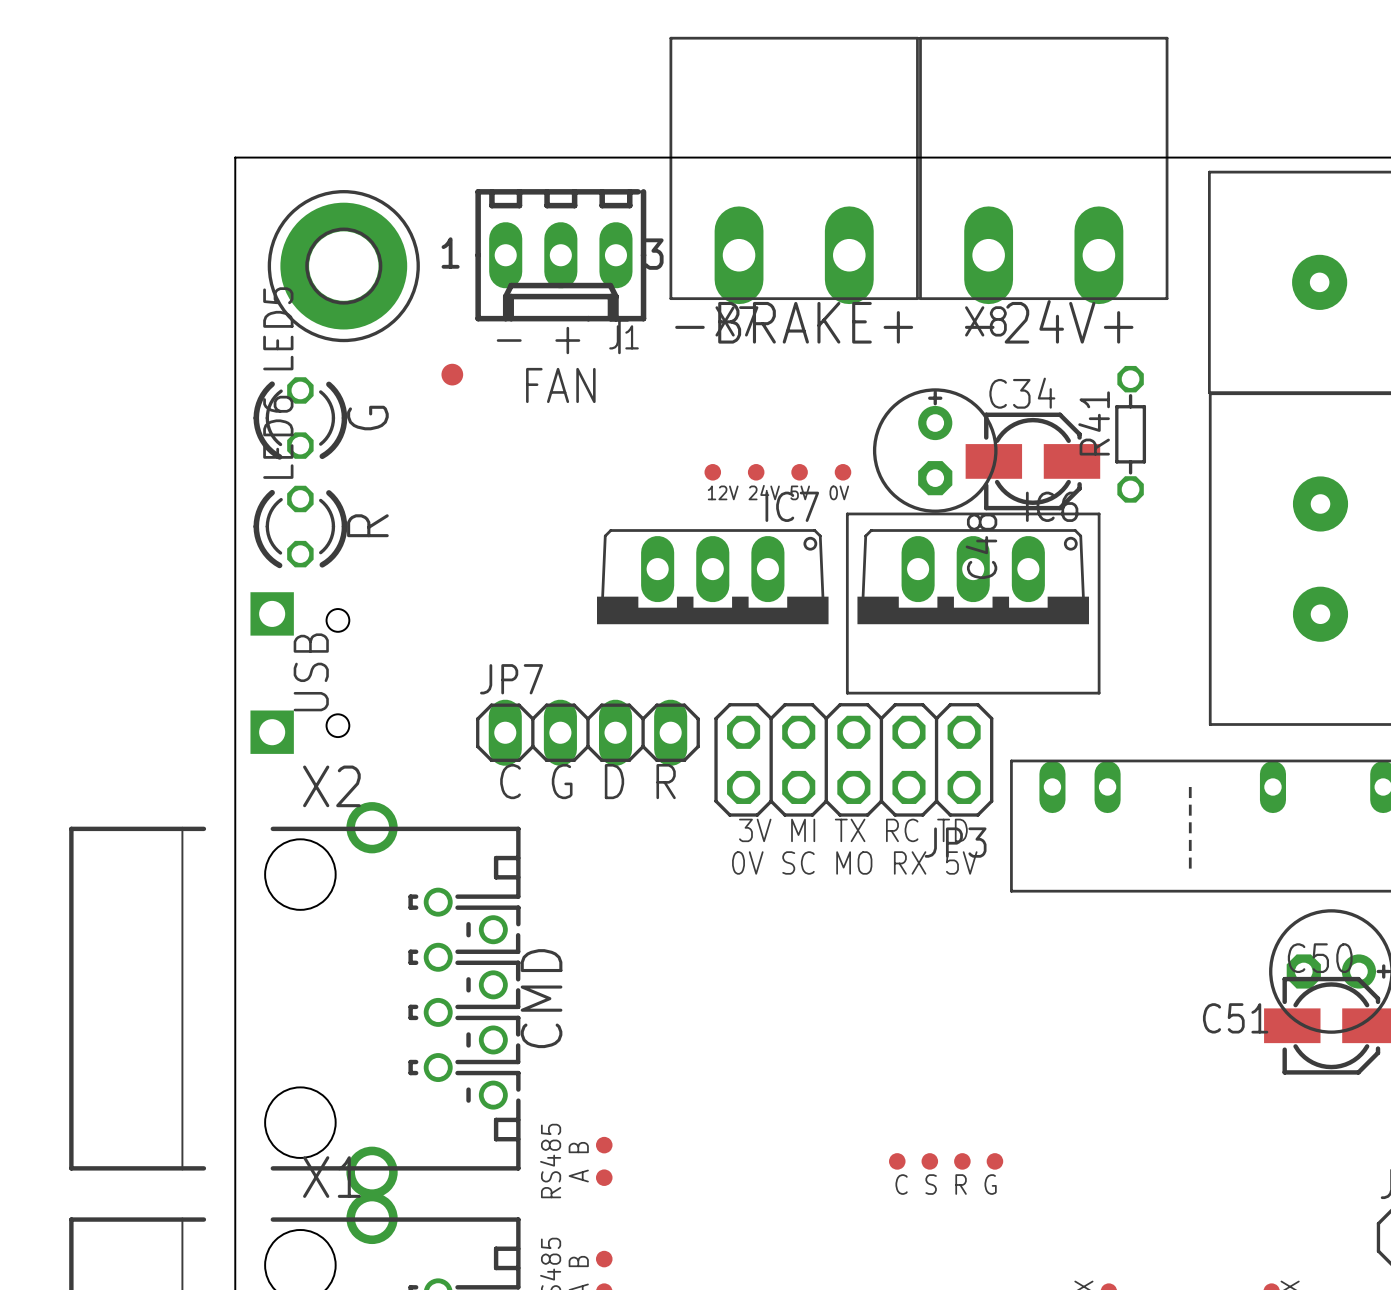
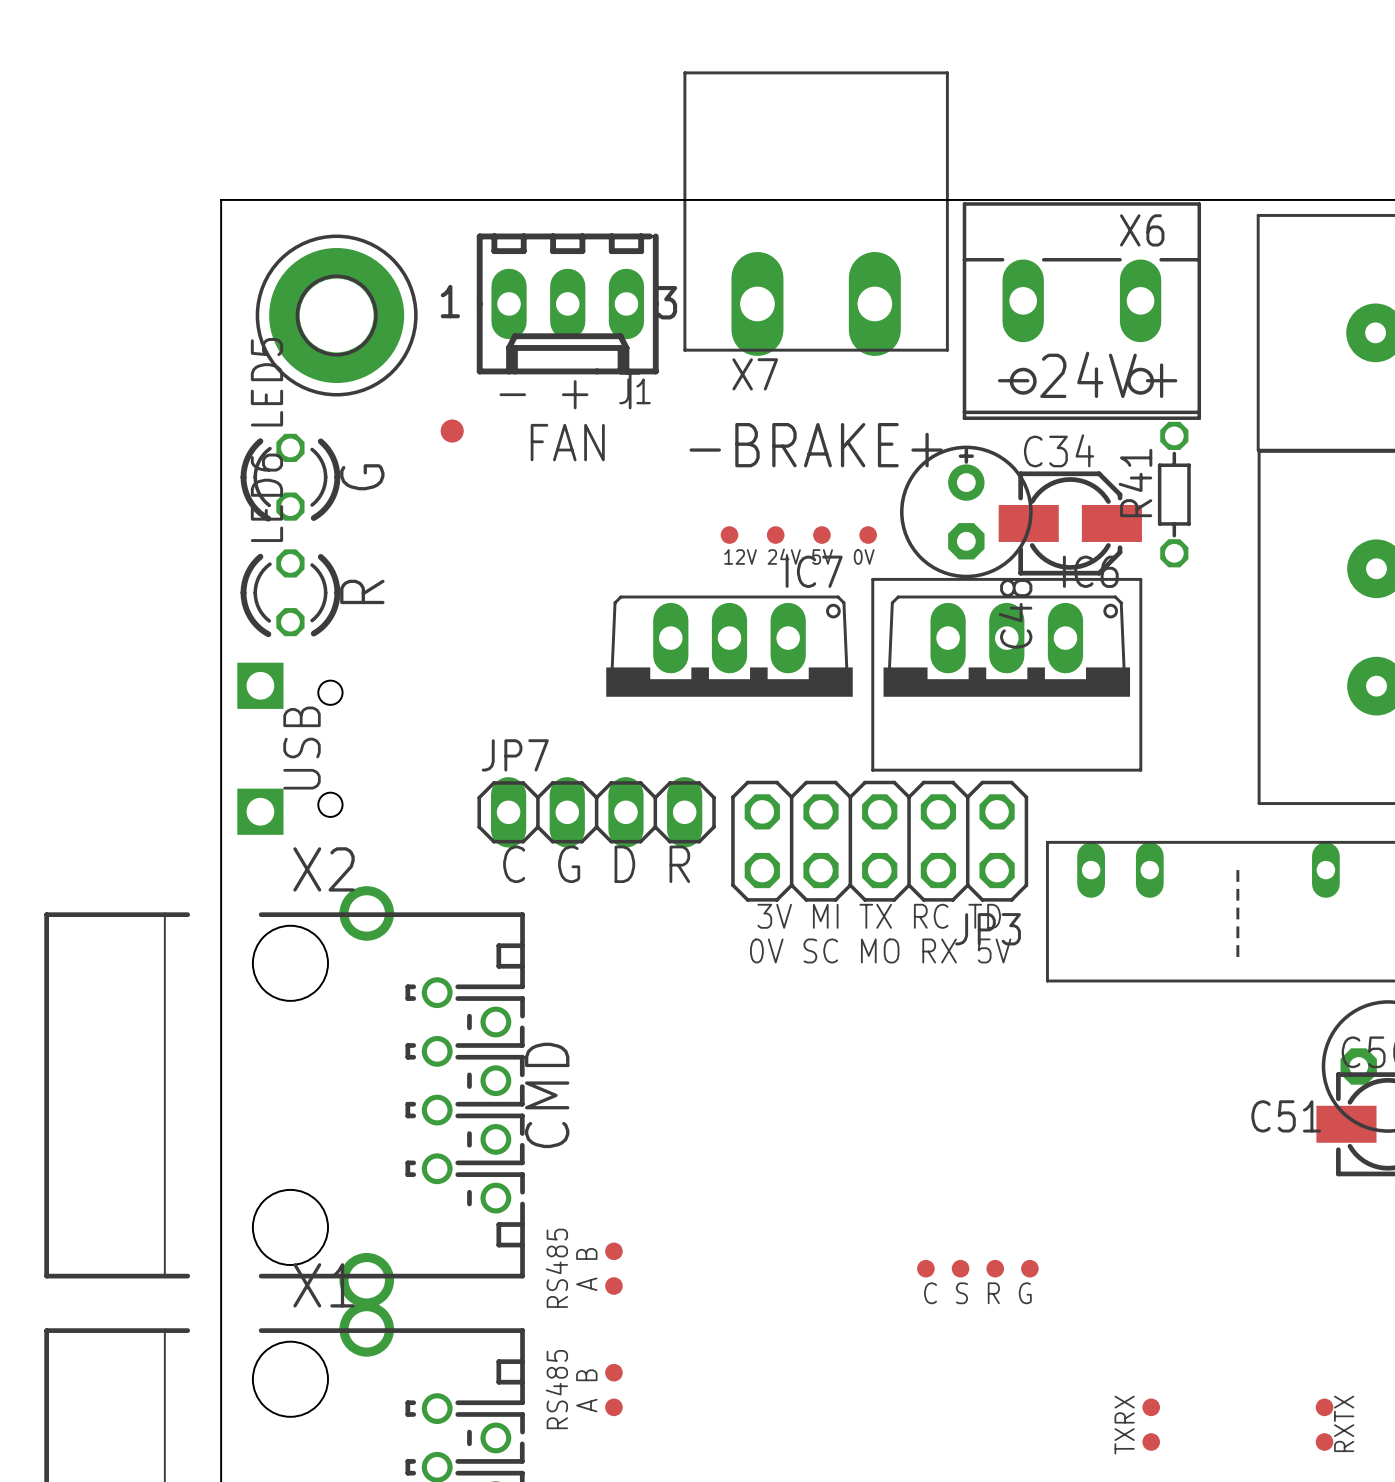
X8: (1043, 170) -> none
X6: none -> (1081, 311)
text position: -BRAKE+ (794, 322) -> -BRAKE+ (816, 445)

